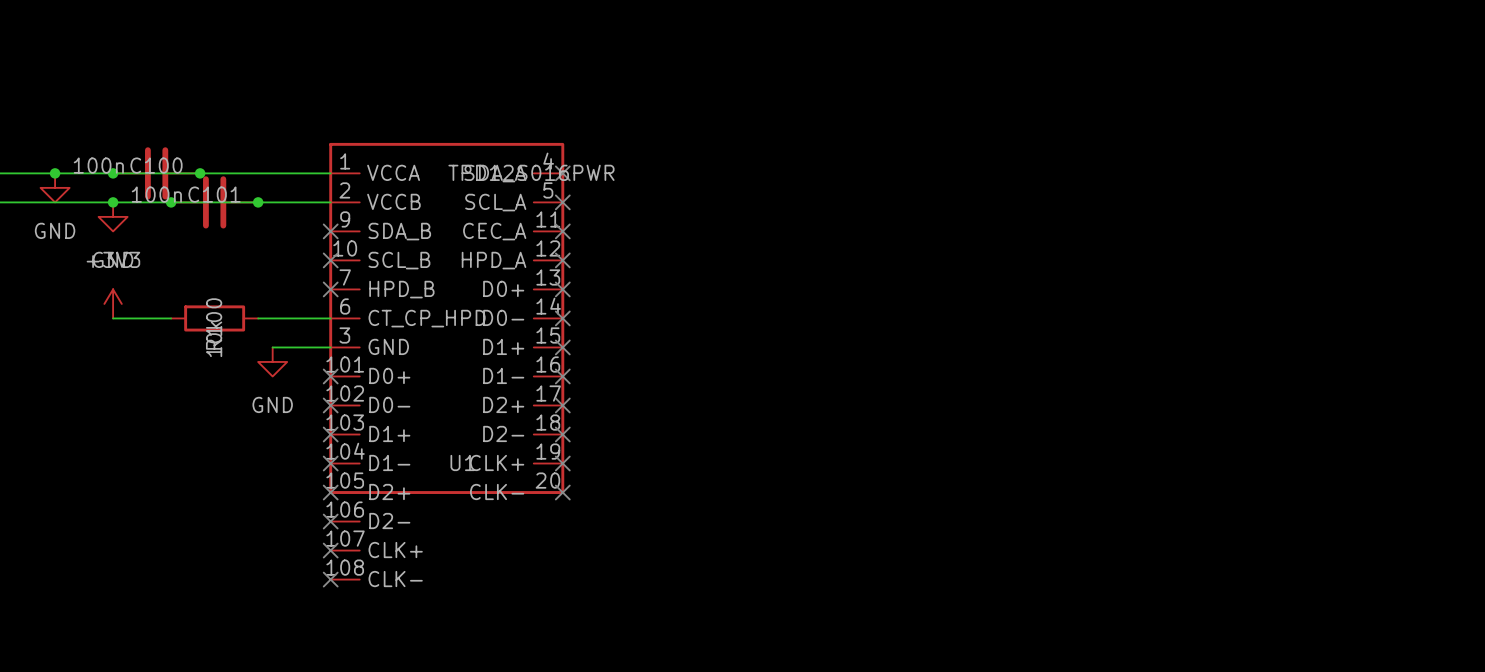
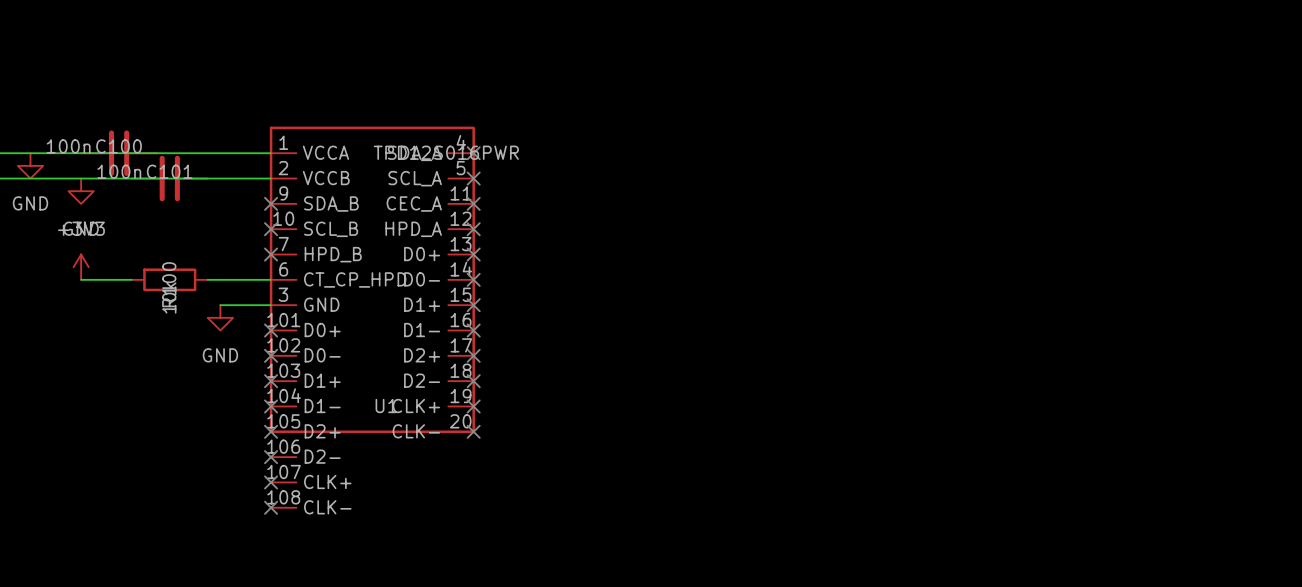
junction: (55, 173) -> none
junction: (113, 173) -> none
junction: (200, 173) -> none
junction: (113, 202) -> none
junction: (171, 202) -> none
junction: (258, 202) -> none

